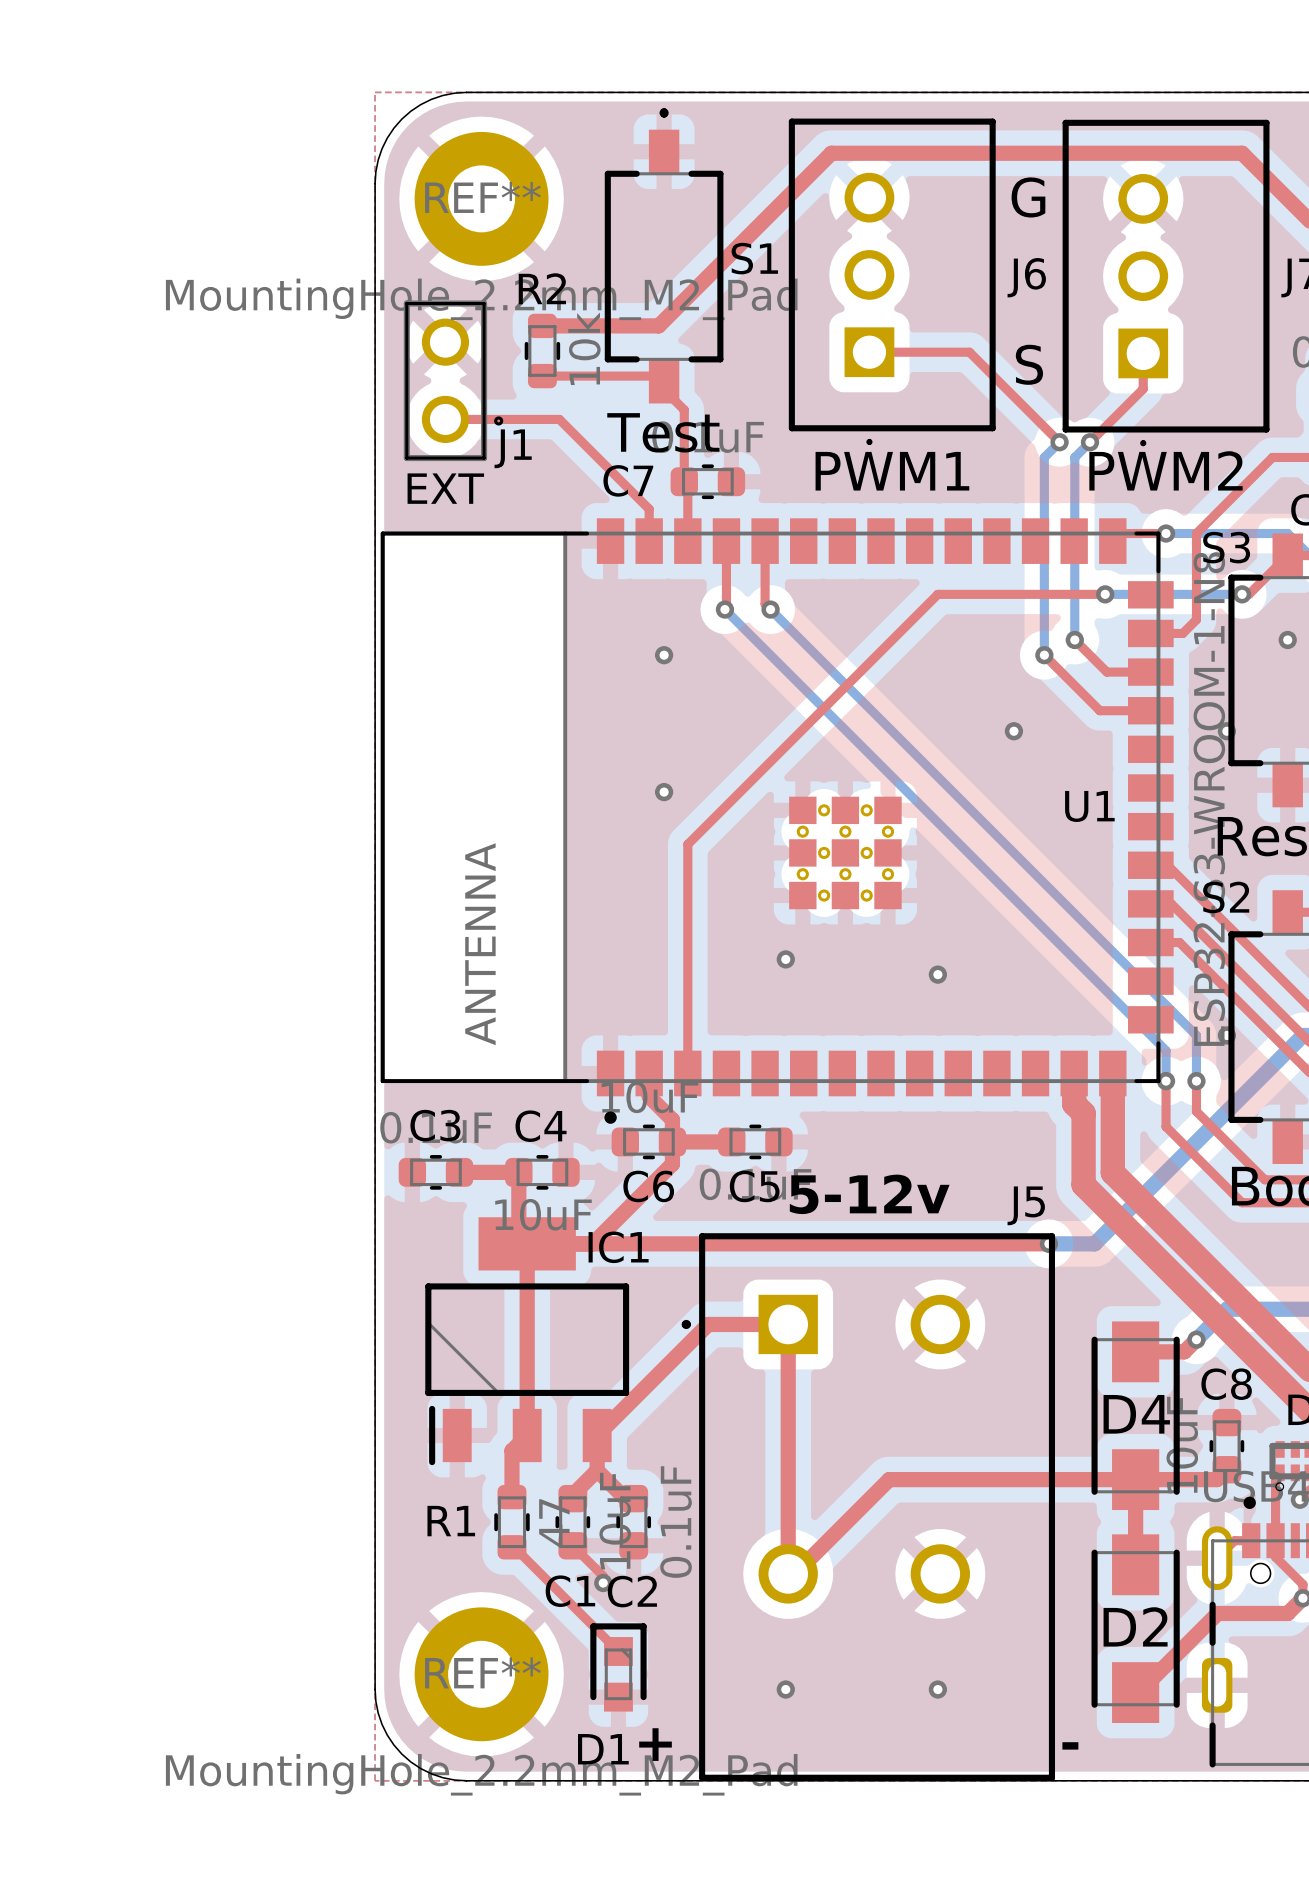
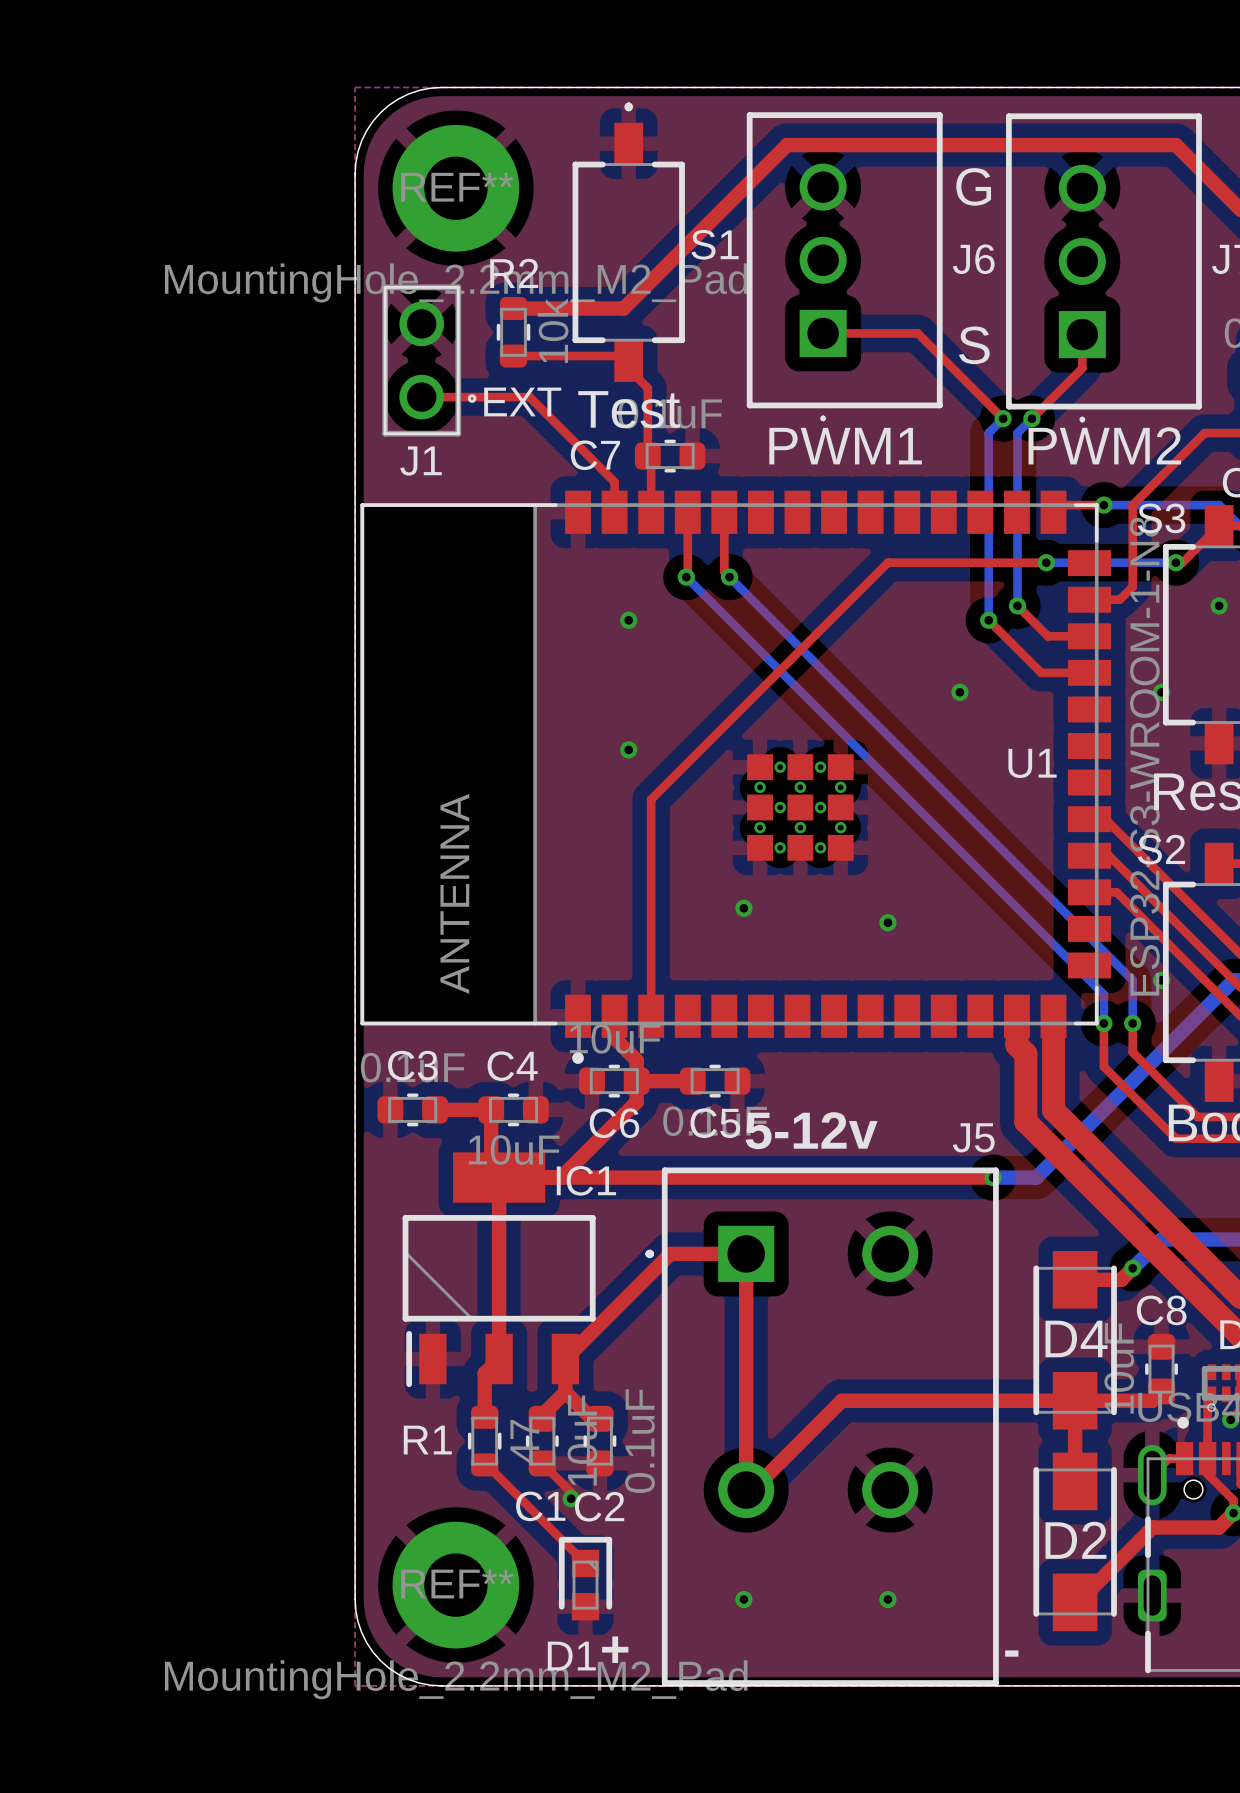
J1 name position: J1 (513, 448) -> J1 (421, 461)
J1 value position: EXT (445, 488) -> EXT (522, 401)

